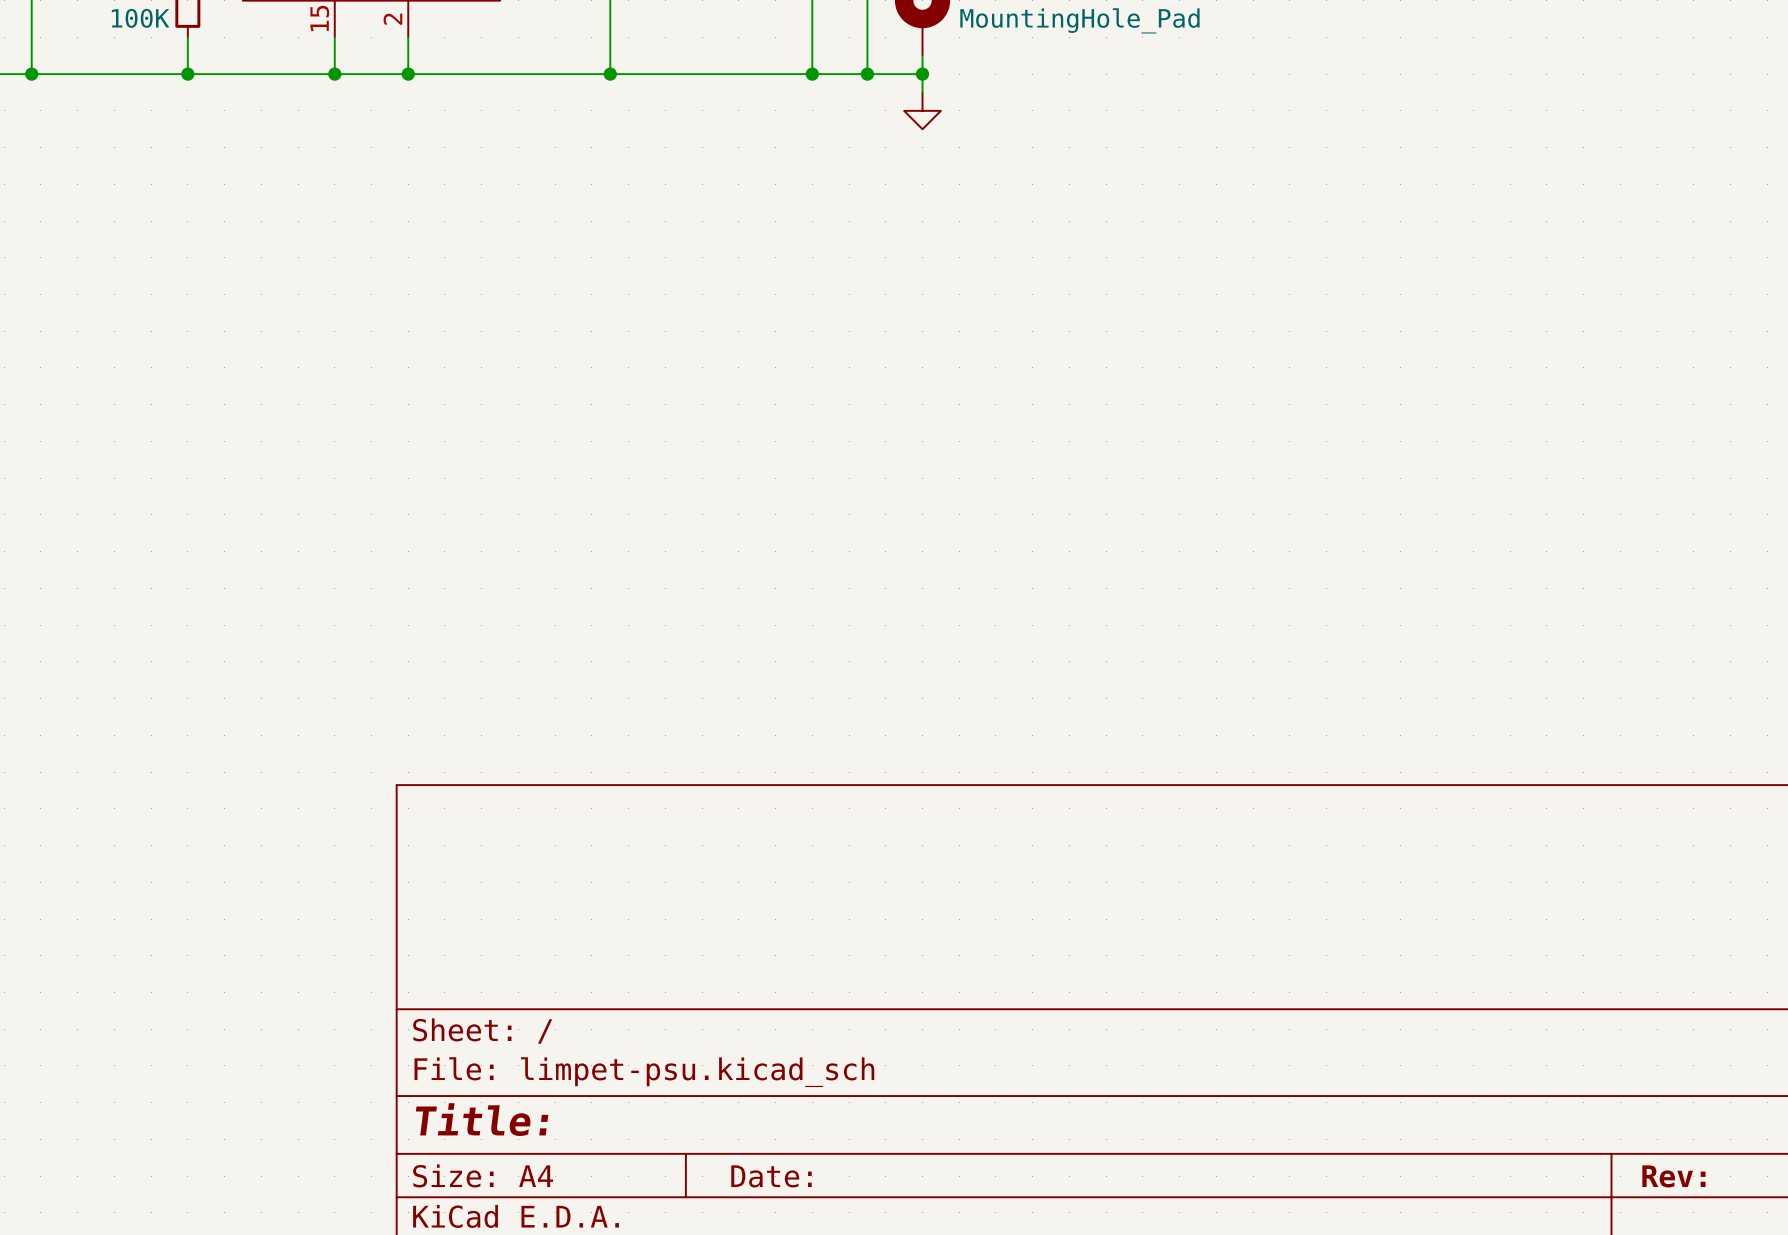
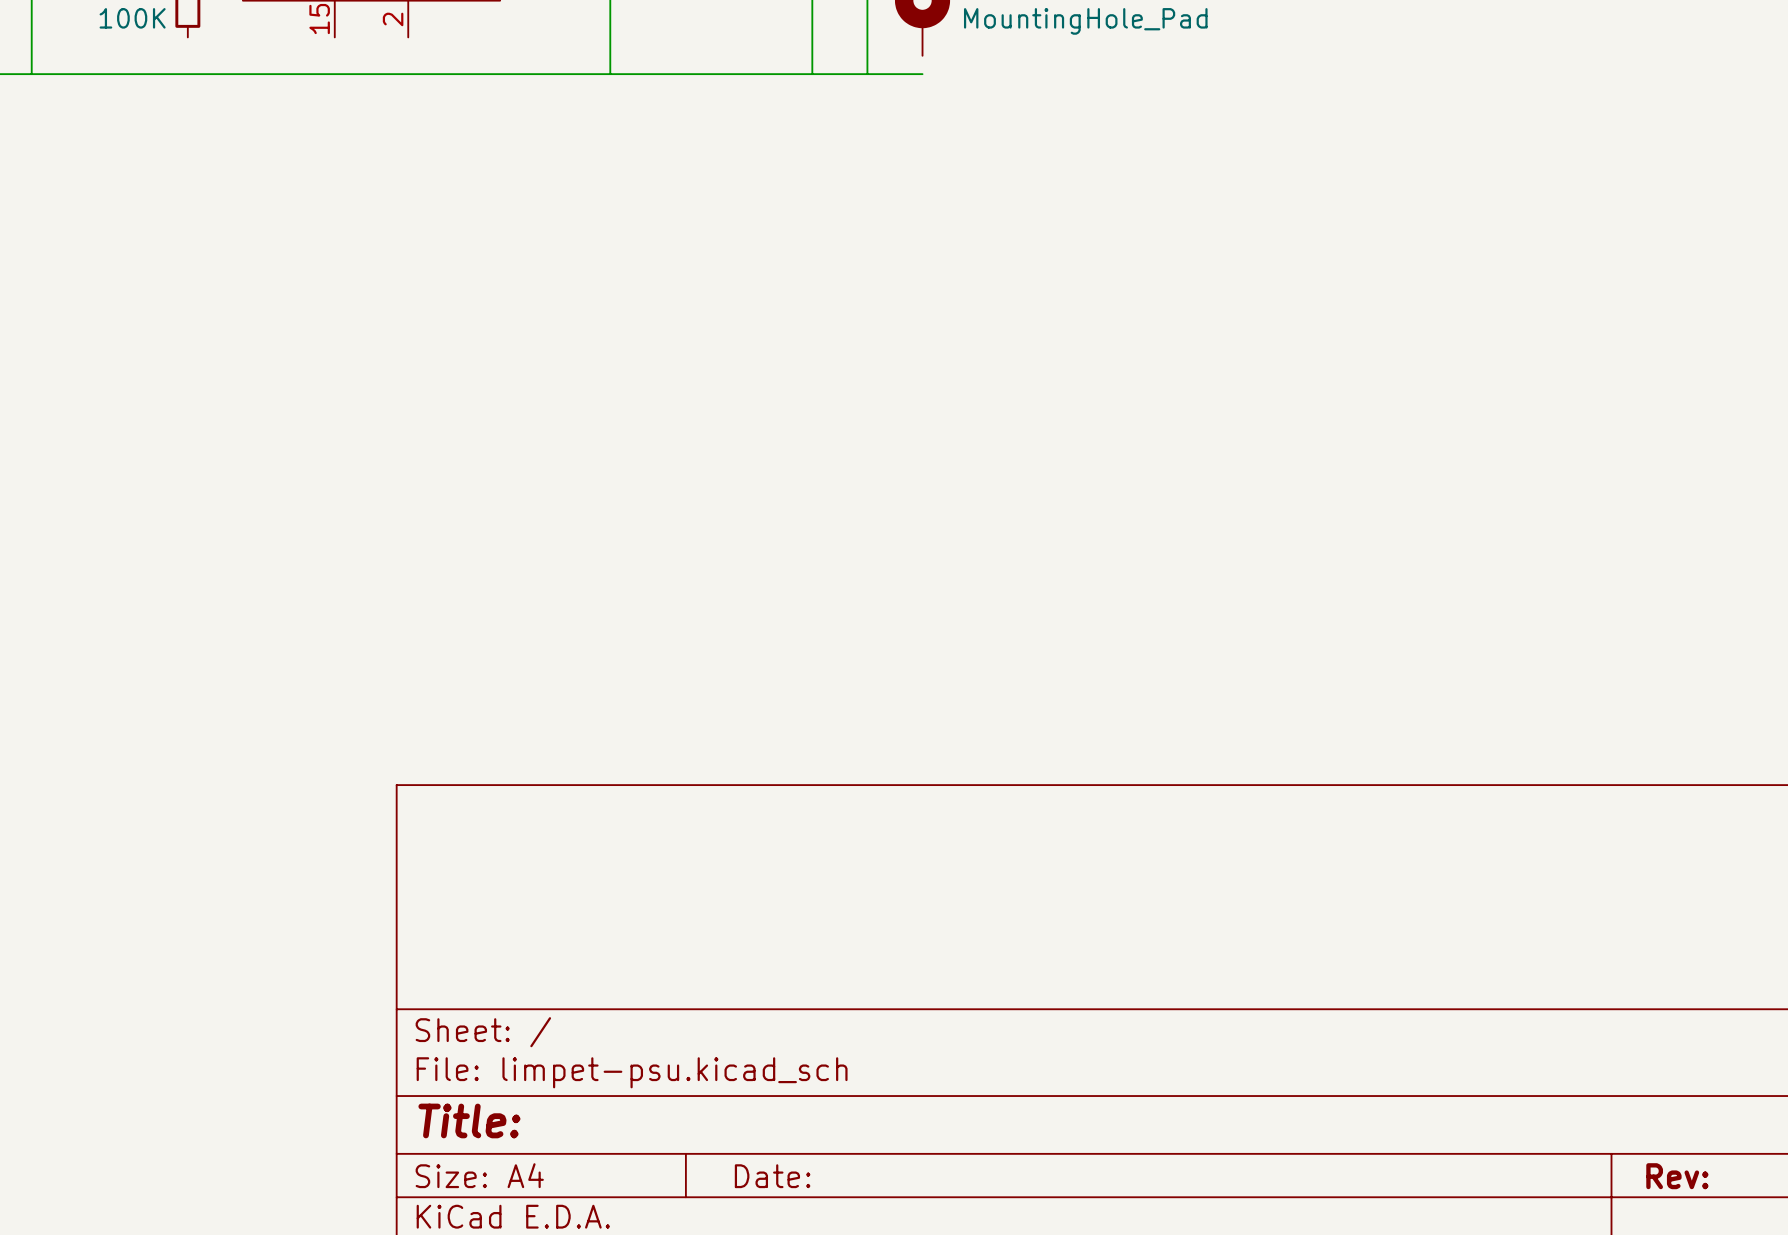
wire: (187, 37) (187, 74) -> none
wire: (334, 37) (334, 74) -> none
wire: (408, 37) (408, 74) -> none
wire: (922, 55) (922, 92) -> none
junction: (31, 74) -> none
junction: (187, 74) -> none
junction: (334, 74) -> none
junction: (408, 74) -> none
junction: (610, 74) -> none
junction: (812, 74) -> none
junction: (867, 74) -> none
junction: (922, 74) -> none
power symbol: (922, 110) -> none

